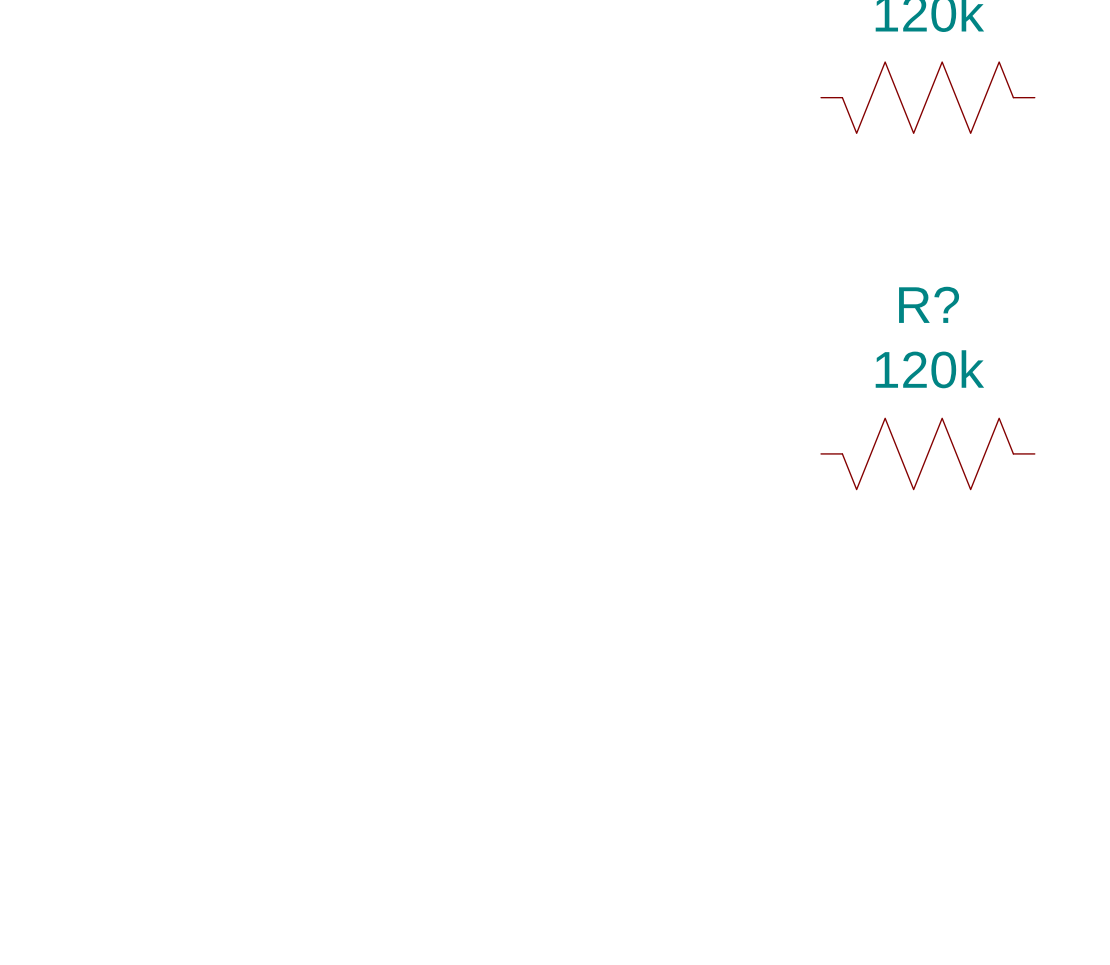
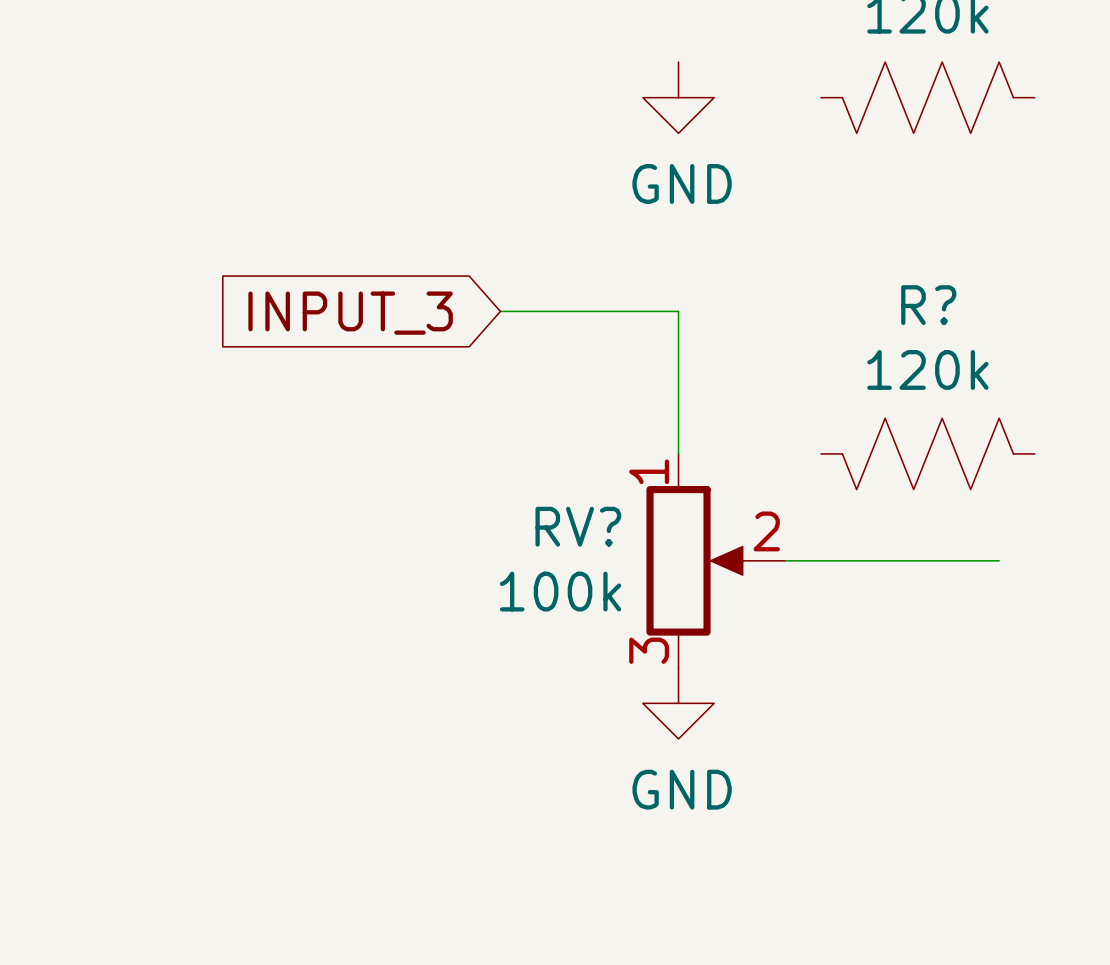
power symbol: none -> GND (678, 97)
wire: none -> (500, 311) (678, 311) (678, 453)
global label: none -> INPUT_3 (350, 313)
RV?: none -> 100k (715, 560)
wire: none -> (785, 560) (999, 560)
power symbol: none -> GND (678, 703)

